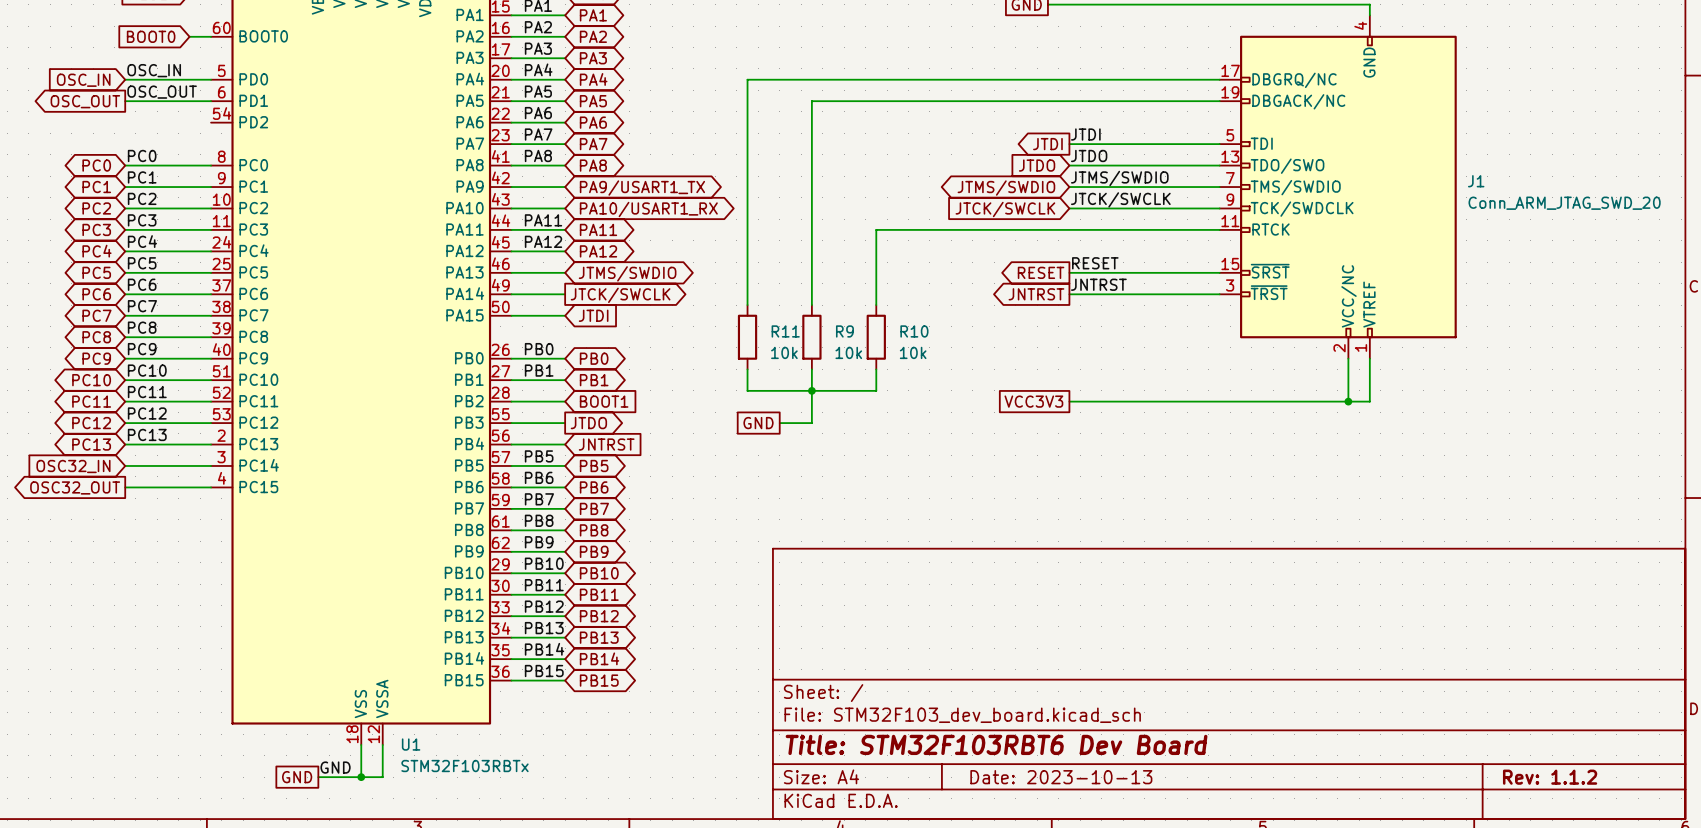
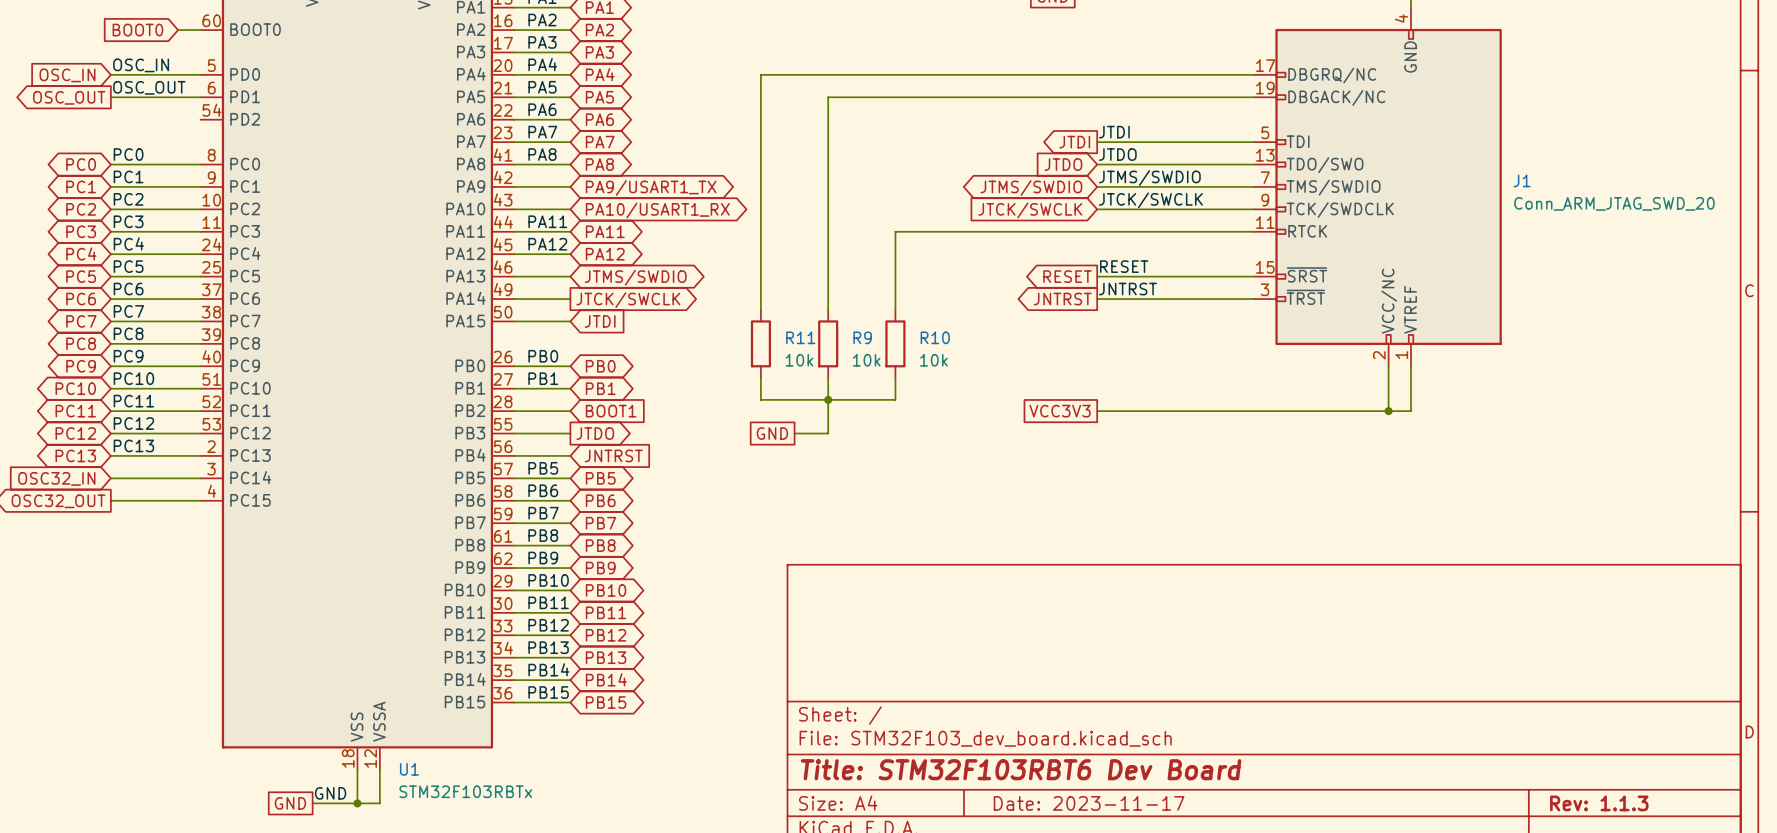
title block: Date: 2023-10-13 (1061, 777) -> Date: 2023-11-17 (1089, 803)
title block: Rev: 1.1.2 (1550, 777) -> Rev: 1.1.3 (1599, 803)

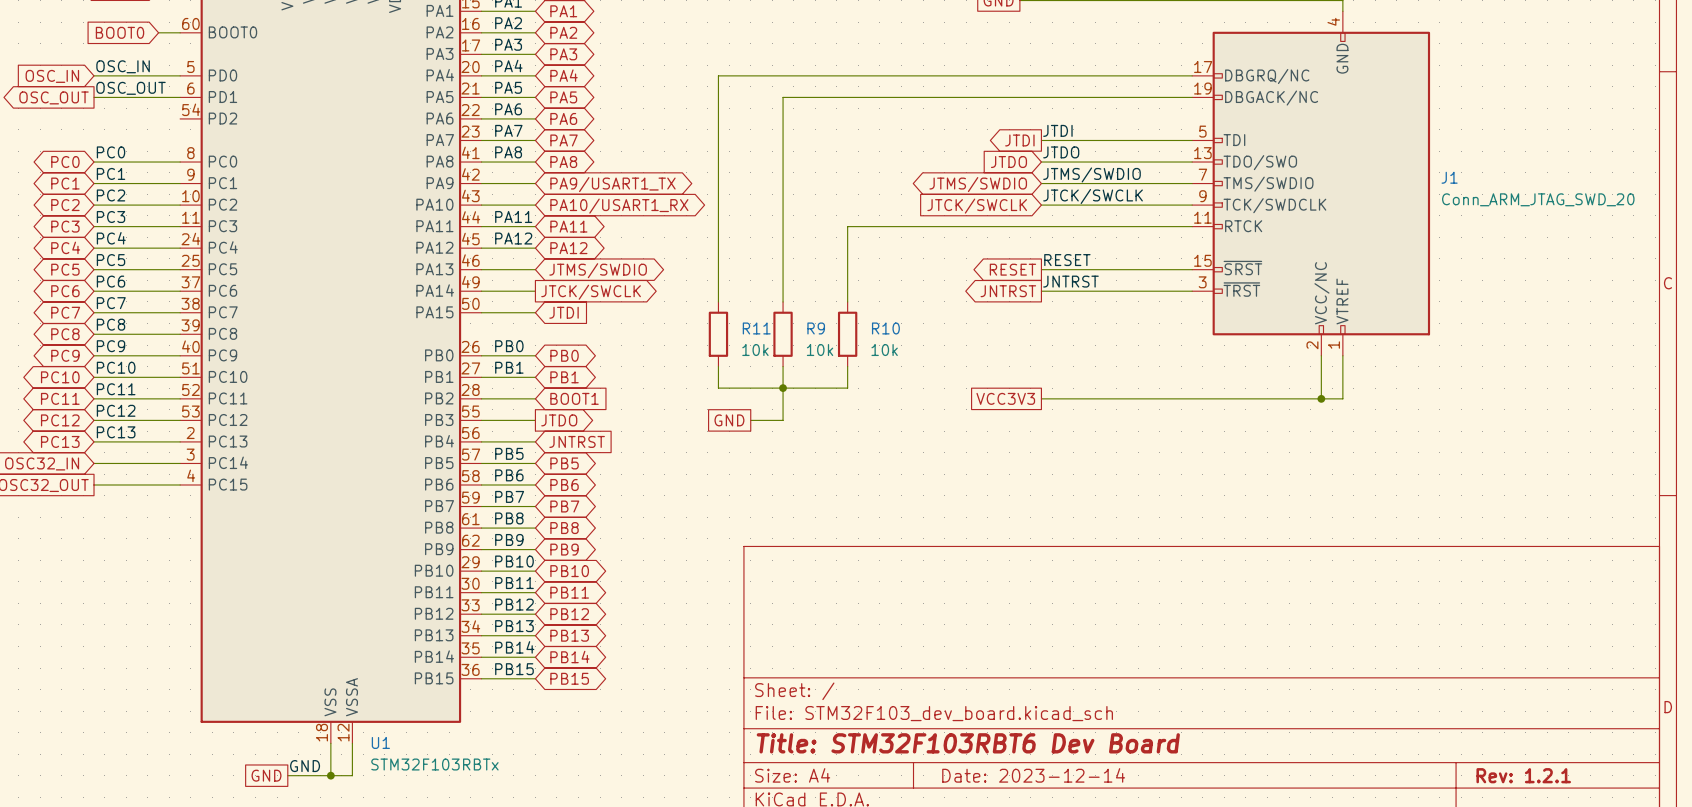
title block: Date: 2023-11-17 (1089, 803) -> Date: 2023-12-14 (1033, 775)
title block: Rev: 1.1.3 (1599, 803) -> Rev: 1.2.1 (1523, 775)

